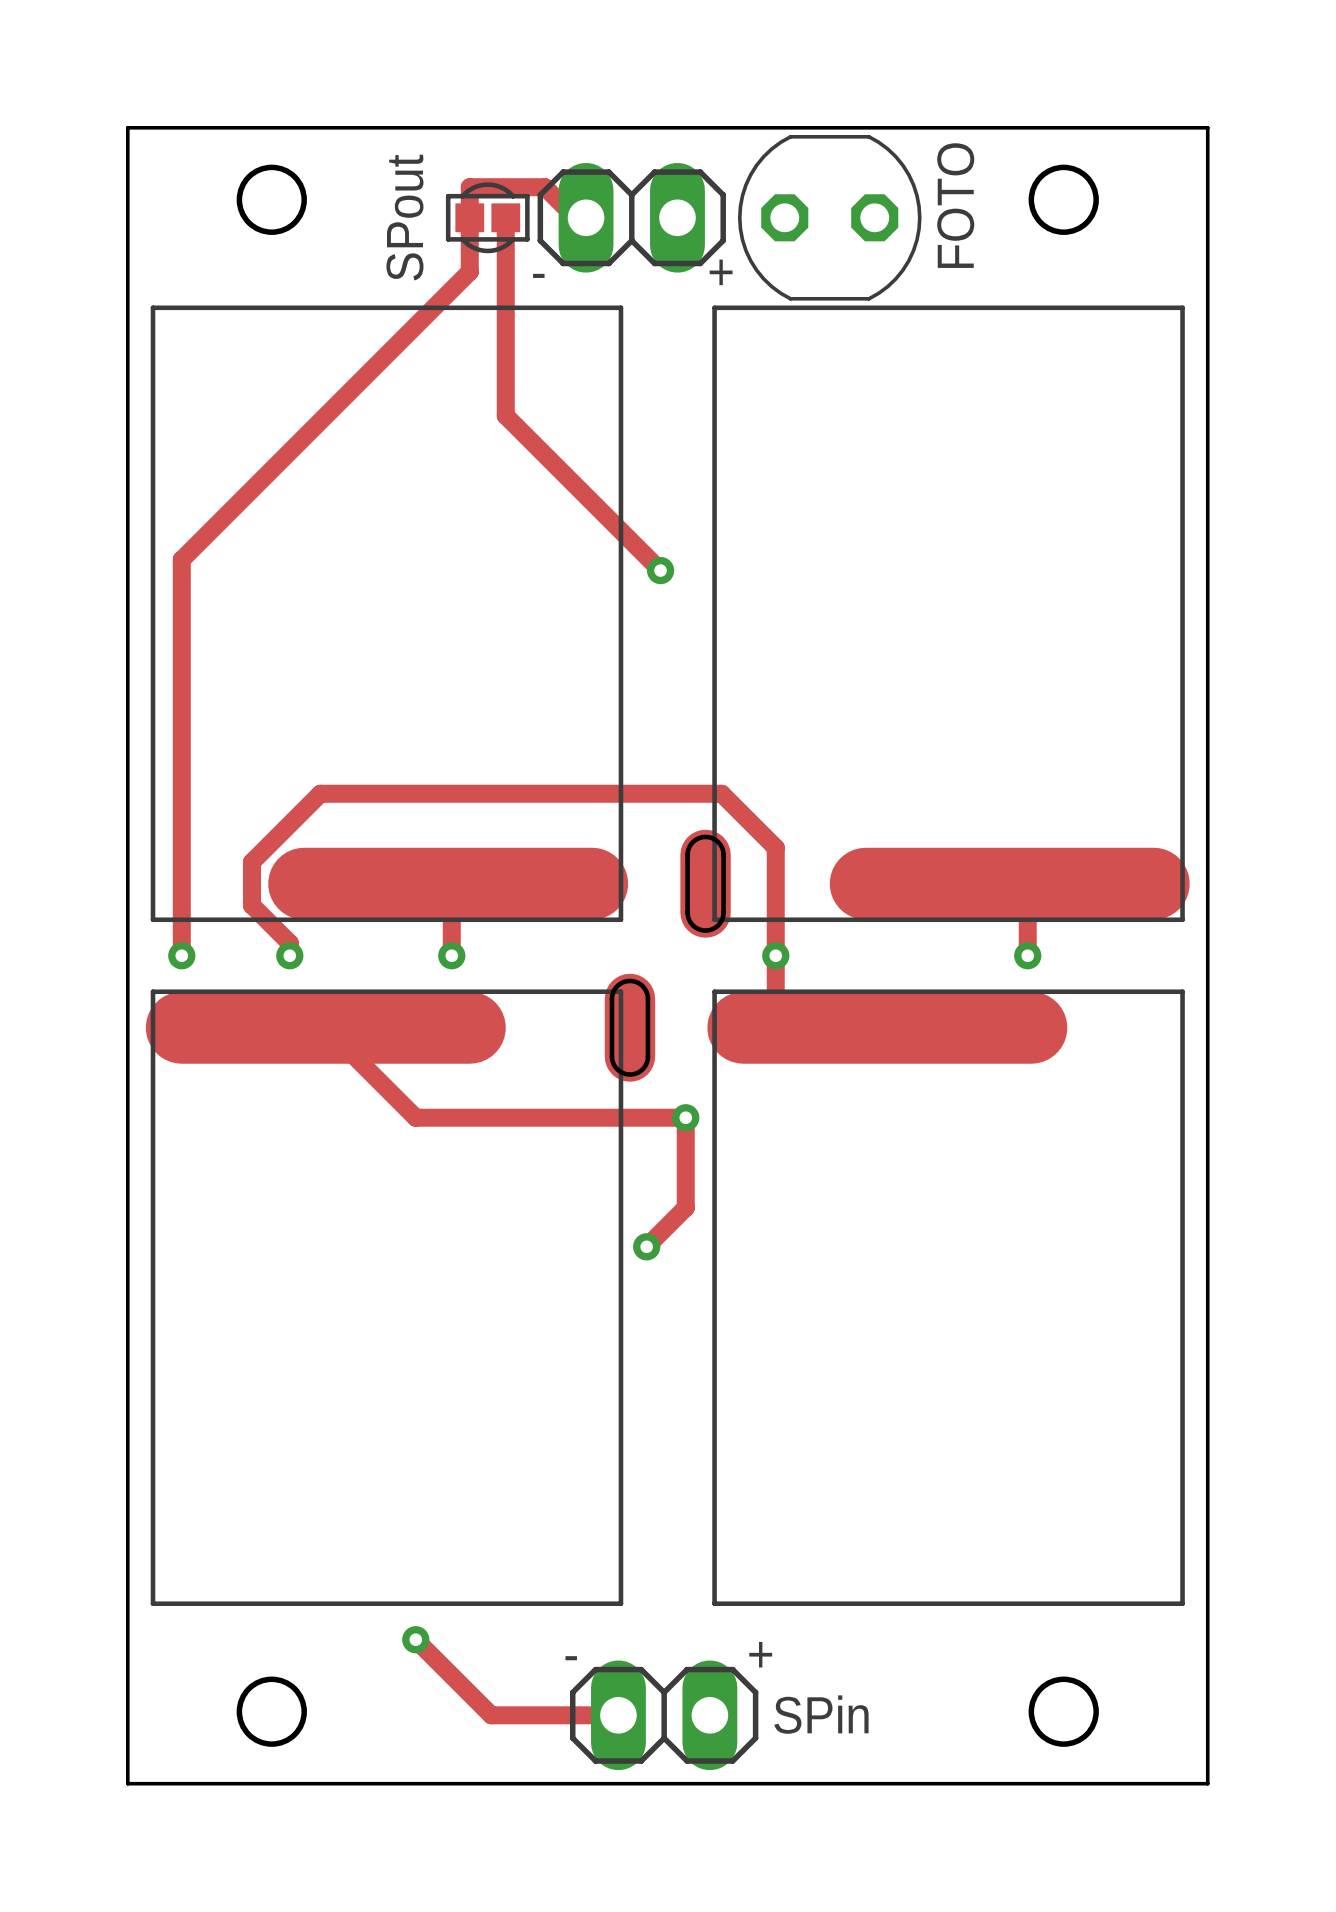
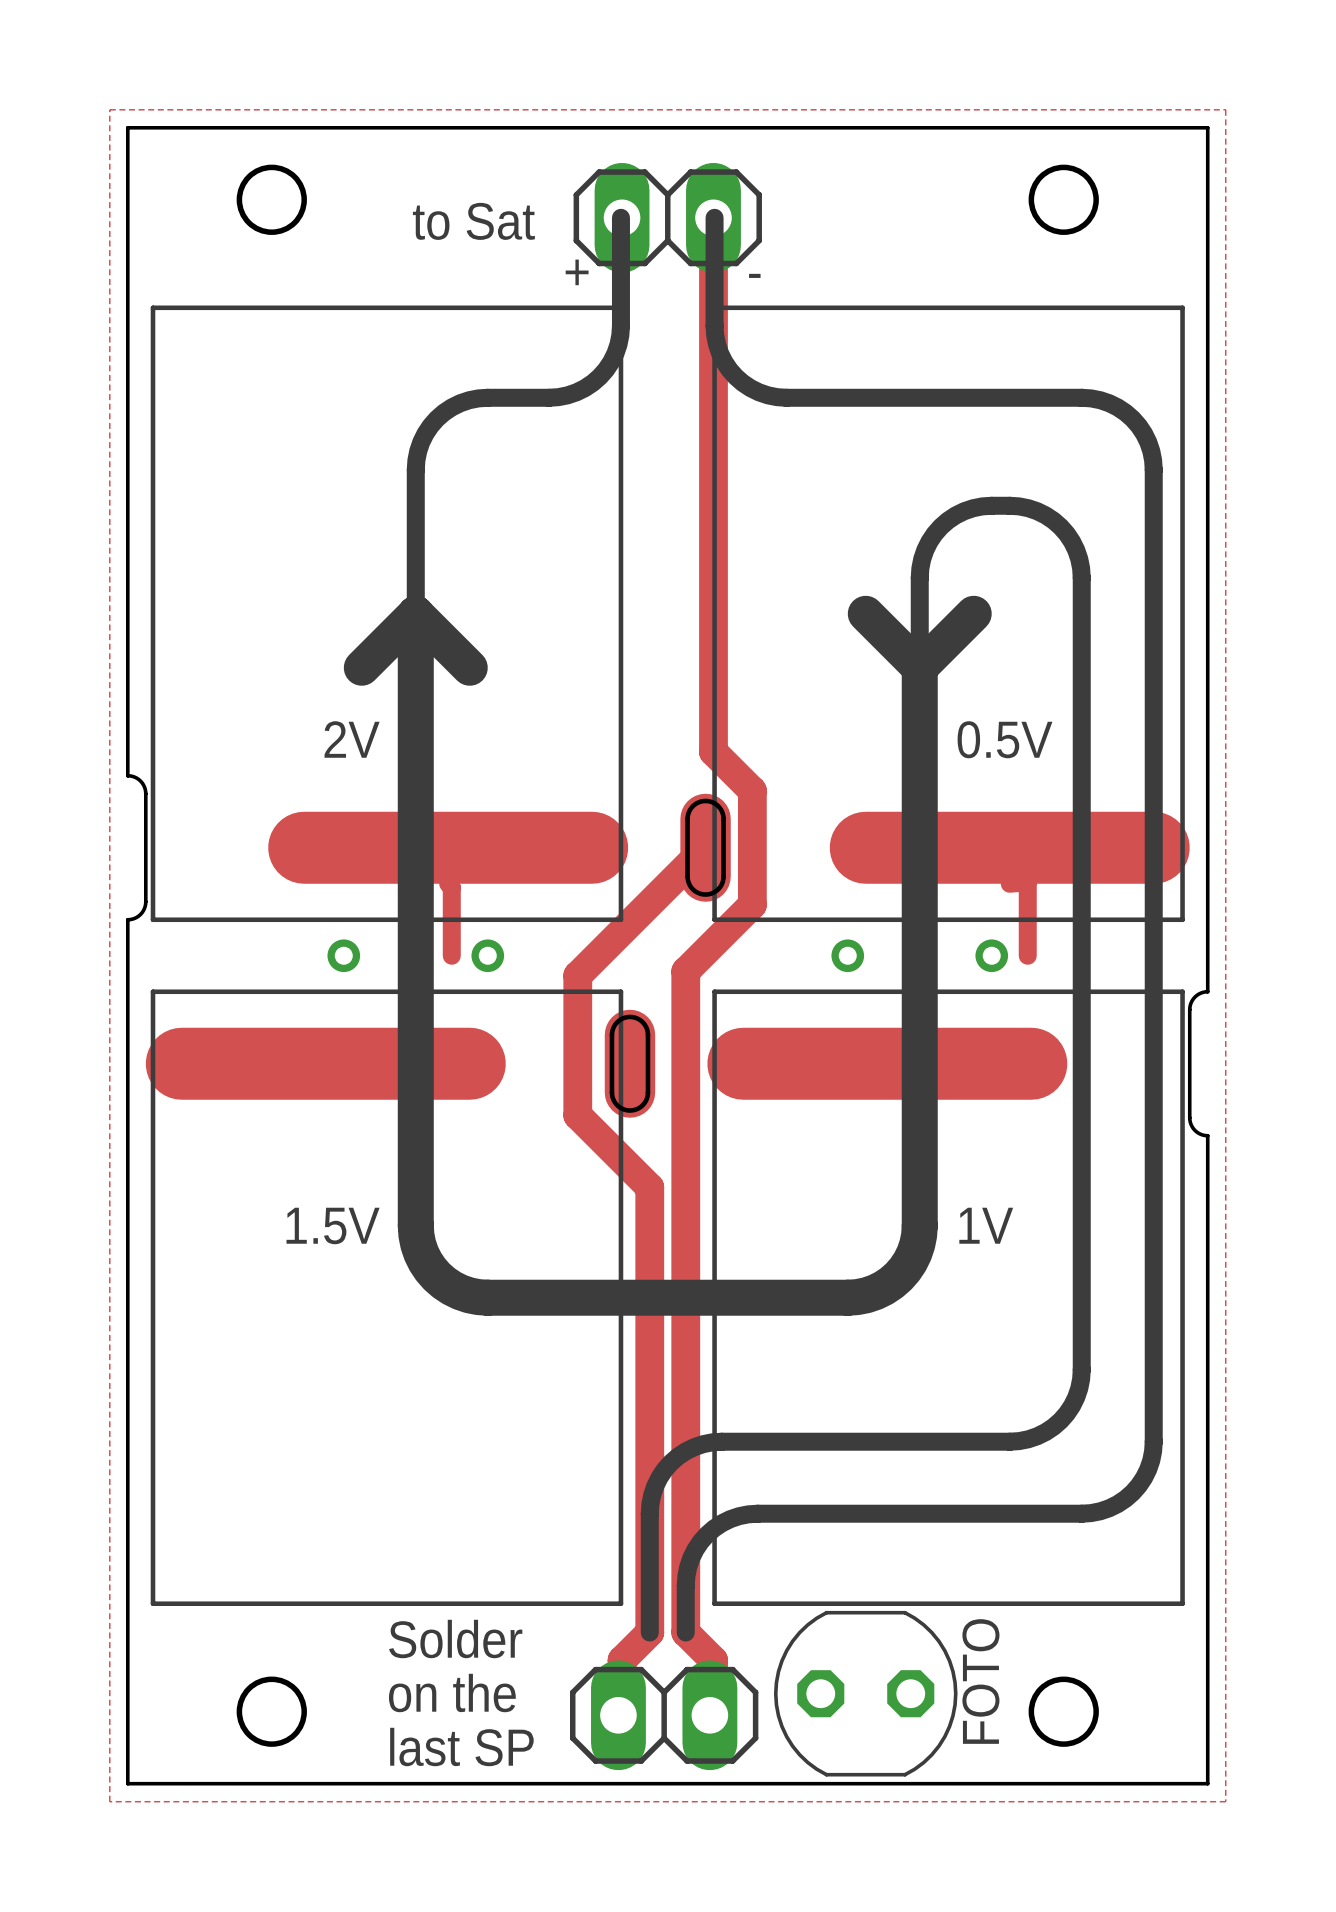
zone outline: none -> (109, 109) (1225, 109) (1225, 1801) (109, 1801) (109, 109)
text: SPout (404, 217) -> none
part: (487, 217) -> none
track: (505, 217) (505, 415) (660, 570) -> none
track: (586, 217) (575, 217) (544, 187) (469, 187) (469, 271) (181, 559) (181, 955) -> none
line: none -> (620, 217) (620, 335) (611, 361) (599, 376) (584, 388) (558, 397) (487, 397) (469, 400) (443, 412) (425, 433) (418, 451) (415, 469) (415, 613)
part position: (631, 217) -> (667, 217)
line: none -> (714, 217) (714, 325) (717, 344) (729, 369) (750, 388) (767, 395) (786, 397) (1091, 398) (1109, 403) (1125, 412) (1138, 425) (1148, 442) (1153, 469) (1153, 1441) (1148, 1469) (1138, 1485) (1117, 1504) (1091, 1513) (757, 1513) (730, 1519) (706, 1534) (691, 1558) (686, 1576) (685, 1632)
FOTO: (829, 217) -> none
text: none -> to Sat (473, 221)
text position: + (721, 272) -> + (577, 272)
text position: - (538, 275) -> - (754, 275)
part footprint: [150, 305, 629, 923] -> [150, 305, 629, 923]
part footprint: [680, 305, 1190, 938] -> [680, 305, 1190, 923]
via: (660, 570) -> none
line: none -> (415, 613) (416, 1235) (425, 1261) (436, 1276) (451, 1288) (478, 1297) (847, 1297) (875, 1292) (891, 1282) (904, 1269) (914, 1253) (919, 1225) (919, 667)
line: none -> (415, 613) (469, 667)
line: none -> (415, 613) (361, 667)
line: none -> (865, 613) (919, 667)
line: none -> (973, 613) (919, 667)
line: none -> (919, 667) (920, 568) (929, 541) (940, 526) (964, 511) (991, 505) (1028, 508) (1045, 515) (1060, 526) (1076, 550) (1081, 577) (1081, 1369) (1079, 1388) (1072, 1405) (1060, 1420) (1045, 1432) (1019, 1441) (721, 1441) (703, 1444) (685, 1451) (670, 1462) (659, 1477) (650, 1504) (649, 1632)
text: none -> 2V (352, 739)
text: none -> 0.5V (1005, 739)
board edge: (127, 775) (127, 919) -> (127, 775) (140, 781) (145, 793) (145, 904) (140, 914) (127, 919)
track: none -> (705, 847) (577, 975) (577, 1115) (649, 1187) (649, 1632) (622, 1660) (622, 1715)
via: (181, 955) -> none
track: (289, 955) (289, 943) (251, 905) (251, 862) (320, 793) (721, 793) (775, 847) (775, 1027) (887, 1027) -> none
via: (289, 955) -> none
via: none -> (343, 955)
via: (451, 955) -> none
via: none -> (487, 955)
via: (775, 955) -> none
via: none -> (847, 955)
via: none -> (991, 955)
via: (1027, 955) -> none
part footprint: [145, 973, 656, 1607] -> [145, 989, 656, 1607]
part footprint: [707, 989, 1185, 1607] -> [707, 989, 1185, 1607]
board edge: (1207, 991) (1207, 1135) -> (1207, 991) (1195, 997) (1189, 1009) (1189, 1120) (1195, 1130) (1207, 1135)
track: (325, 1027) (415, 1117) (685, 1117) -> (713, 217) (713, 751) (752, 790) (752, 904) (685, 971) (685, 1117)
track width: thin (685, 1117) (685, 1207) -> thick (685, 1117) (685, 1207)
via: (685, 1117) -> none
track: (685, 1207) (646, 1246) -> (685, 1207) (685, 1632) (713, 1660) (713, 1715)
text: none -> 1.5V (333, 1225)
text: none -> 1V (986, 1225)
via: (646, 1246) -> none
track: (415, 1639) (491, 1715) (618, 1715) -> none
via: (415, 1639) -> none
text: none -> Solder (455, 1639)
text: + (760, 1654) -> none
text: - (571, 1658) -> none
text: none -> on the (452, 1693)
FOTO: none -> (865, 1693)
text: SPin (821, 1714) -> none
text: none -> last SP (461, 1747)

